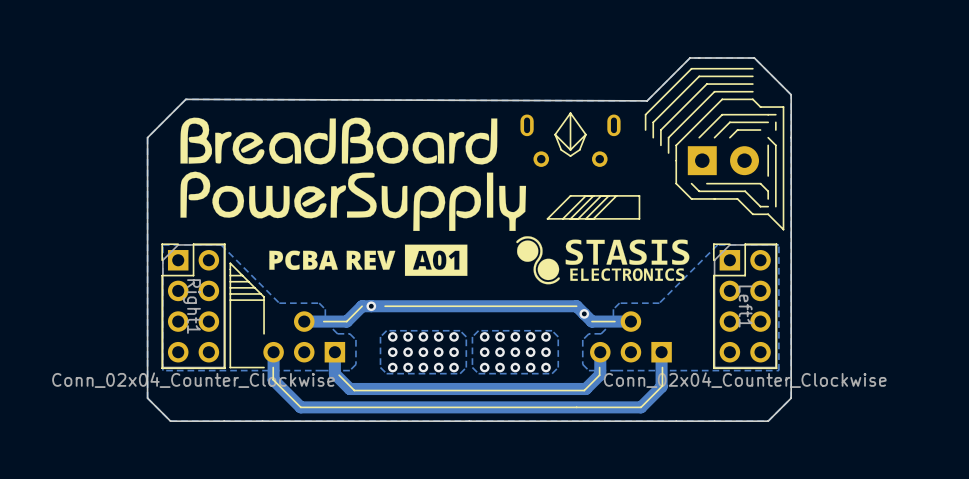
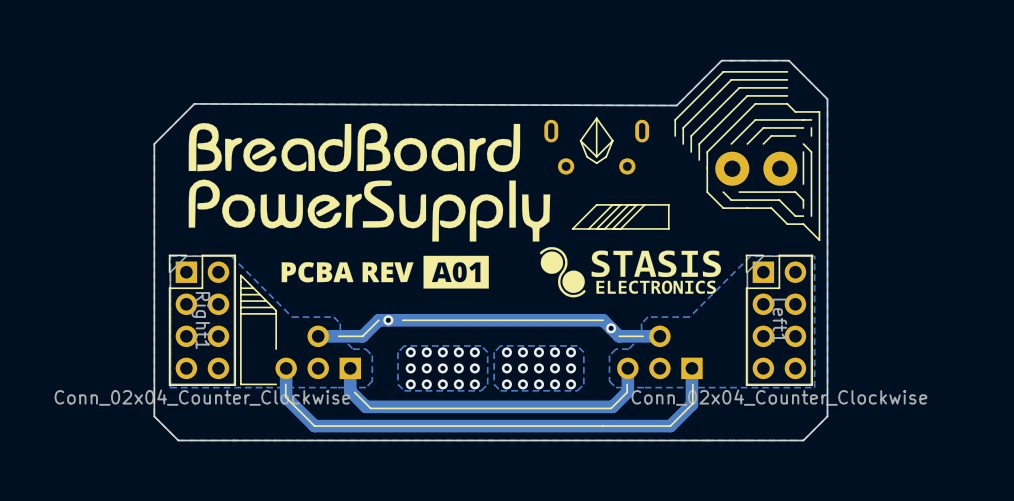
part footprint: [687, 146, 760, 176] -> [715, 151, 798, 186]

